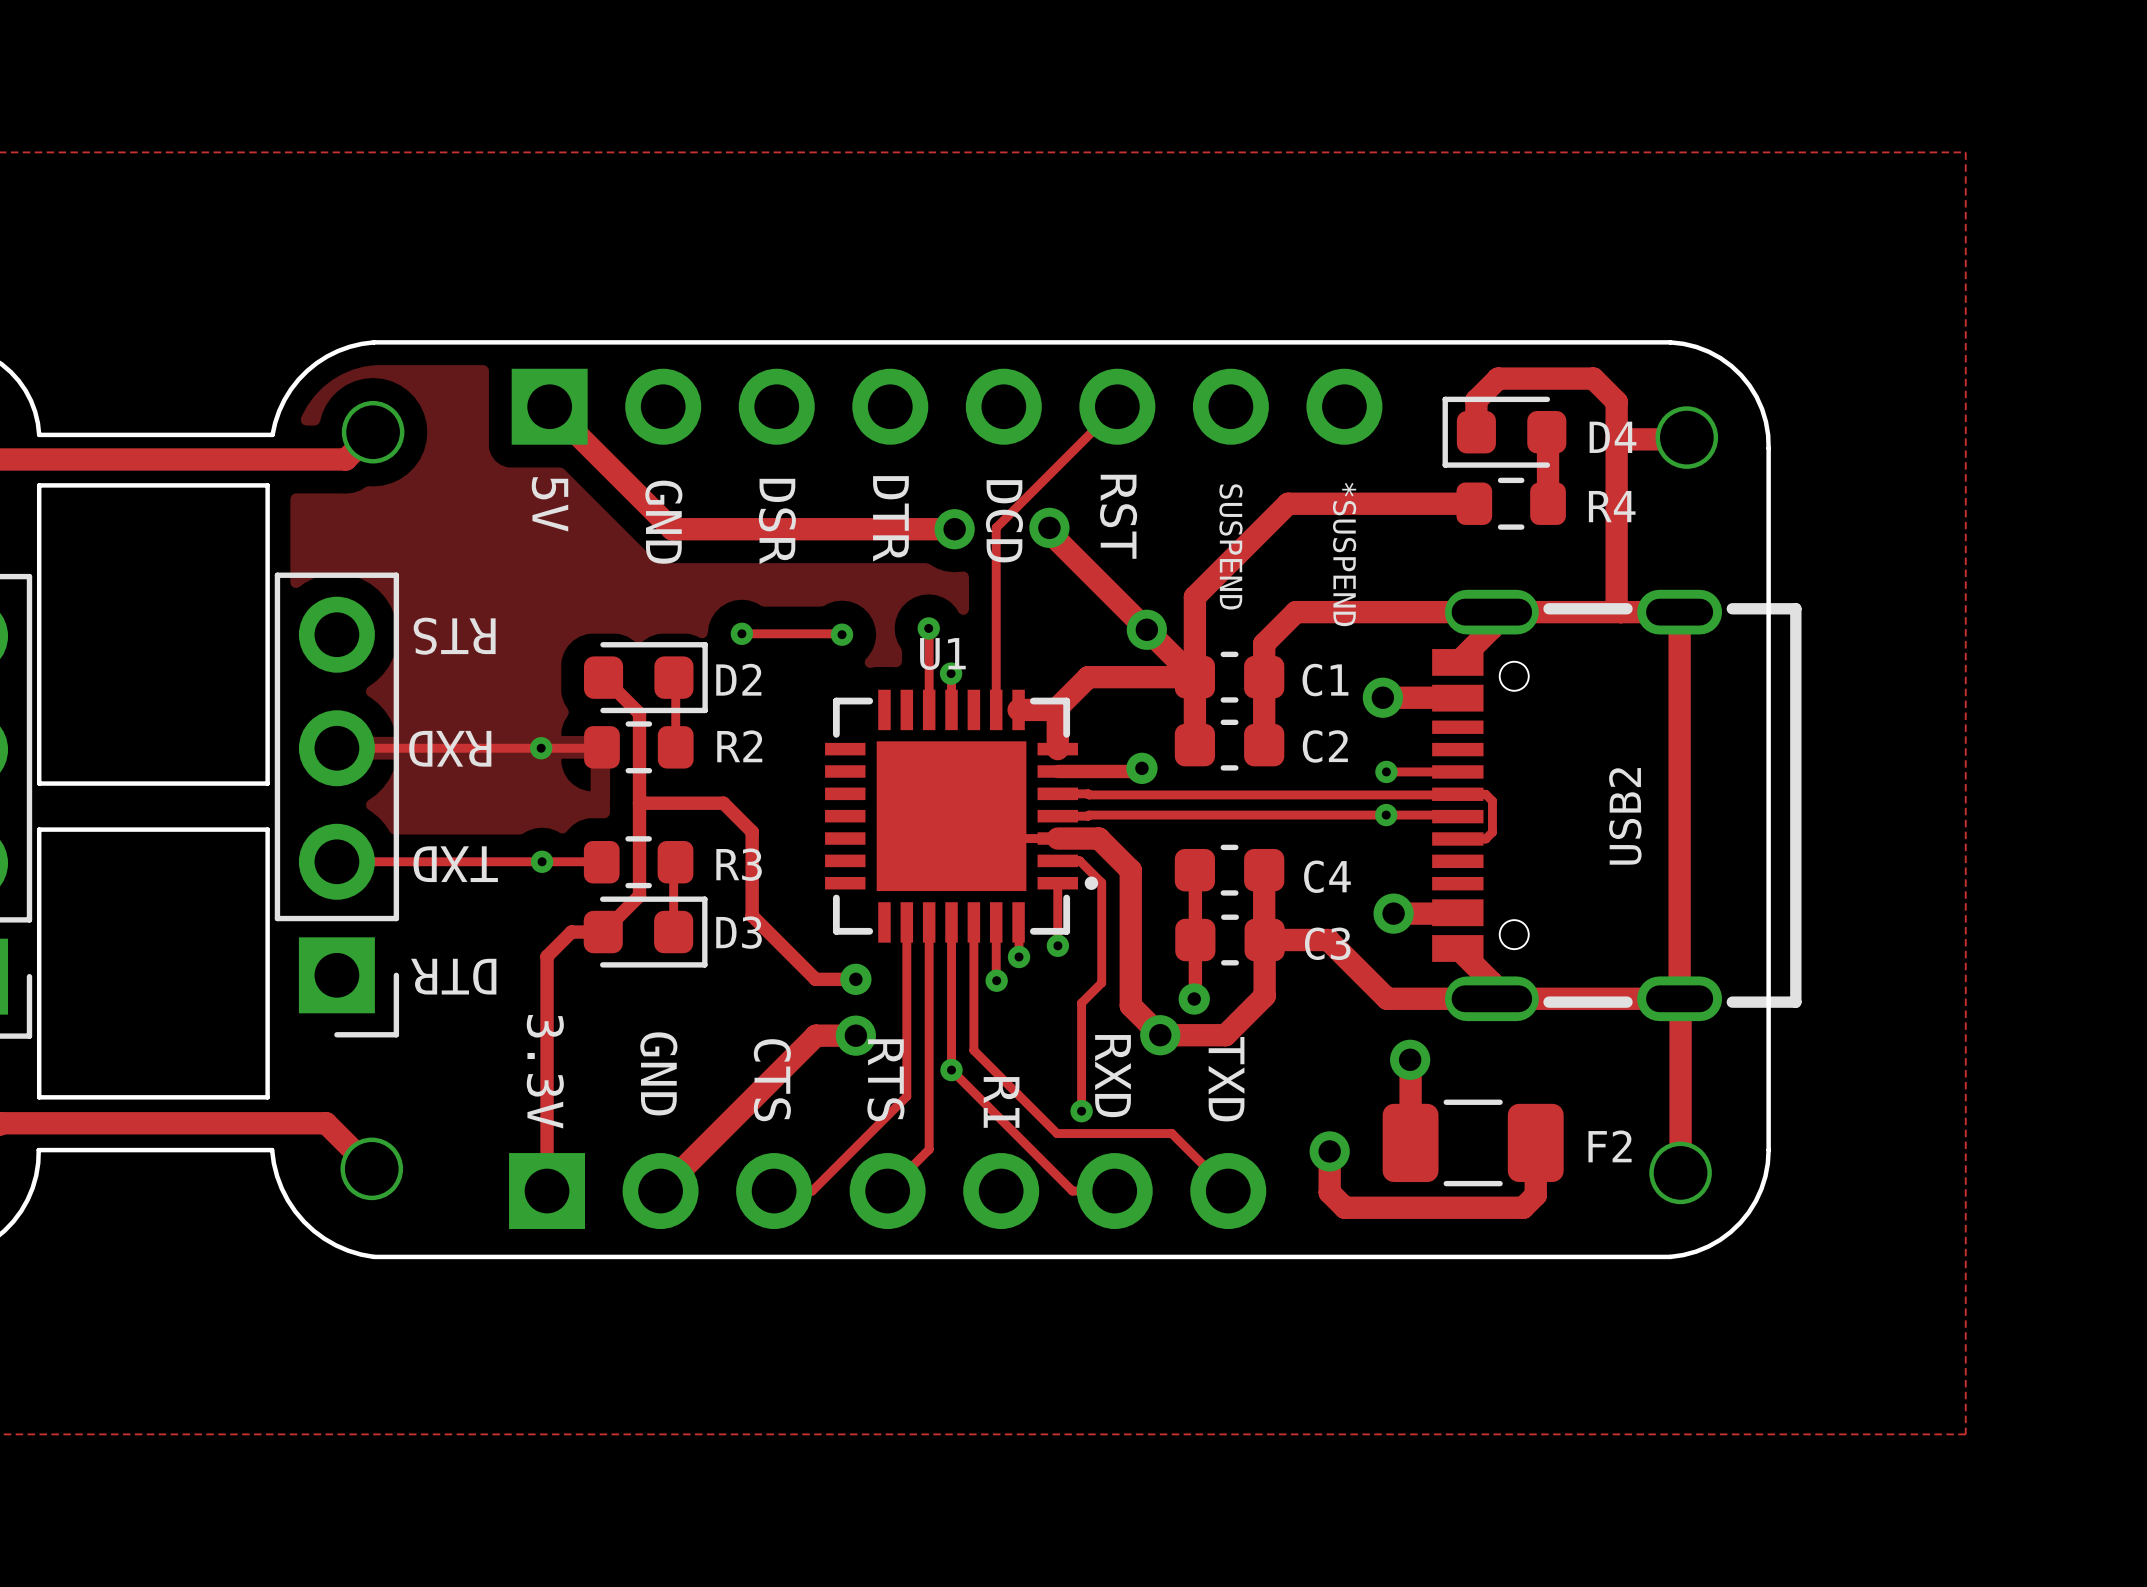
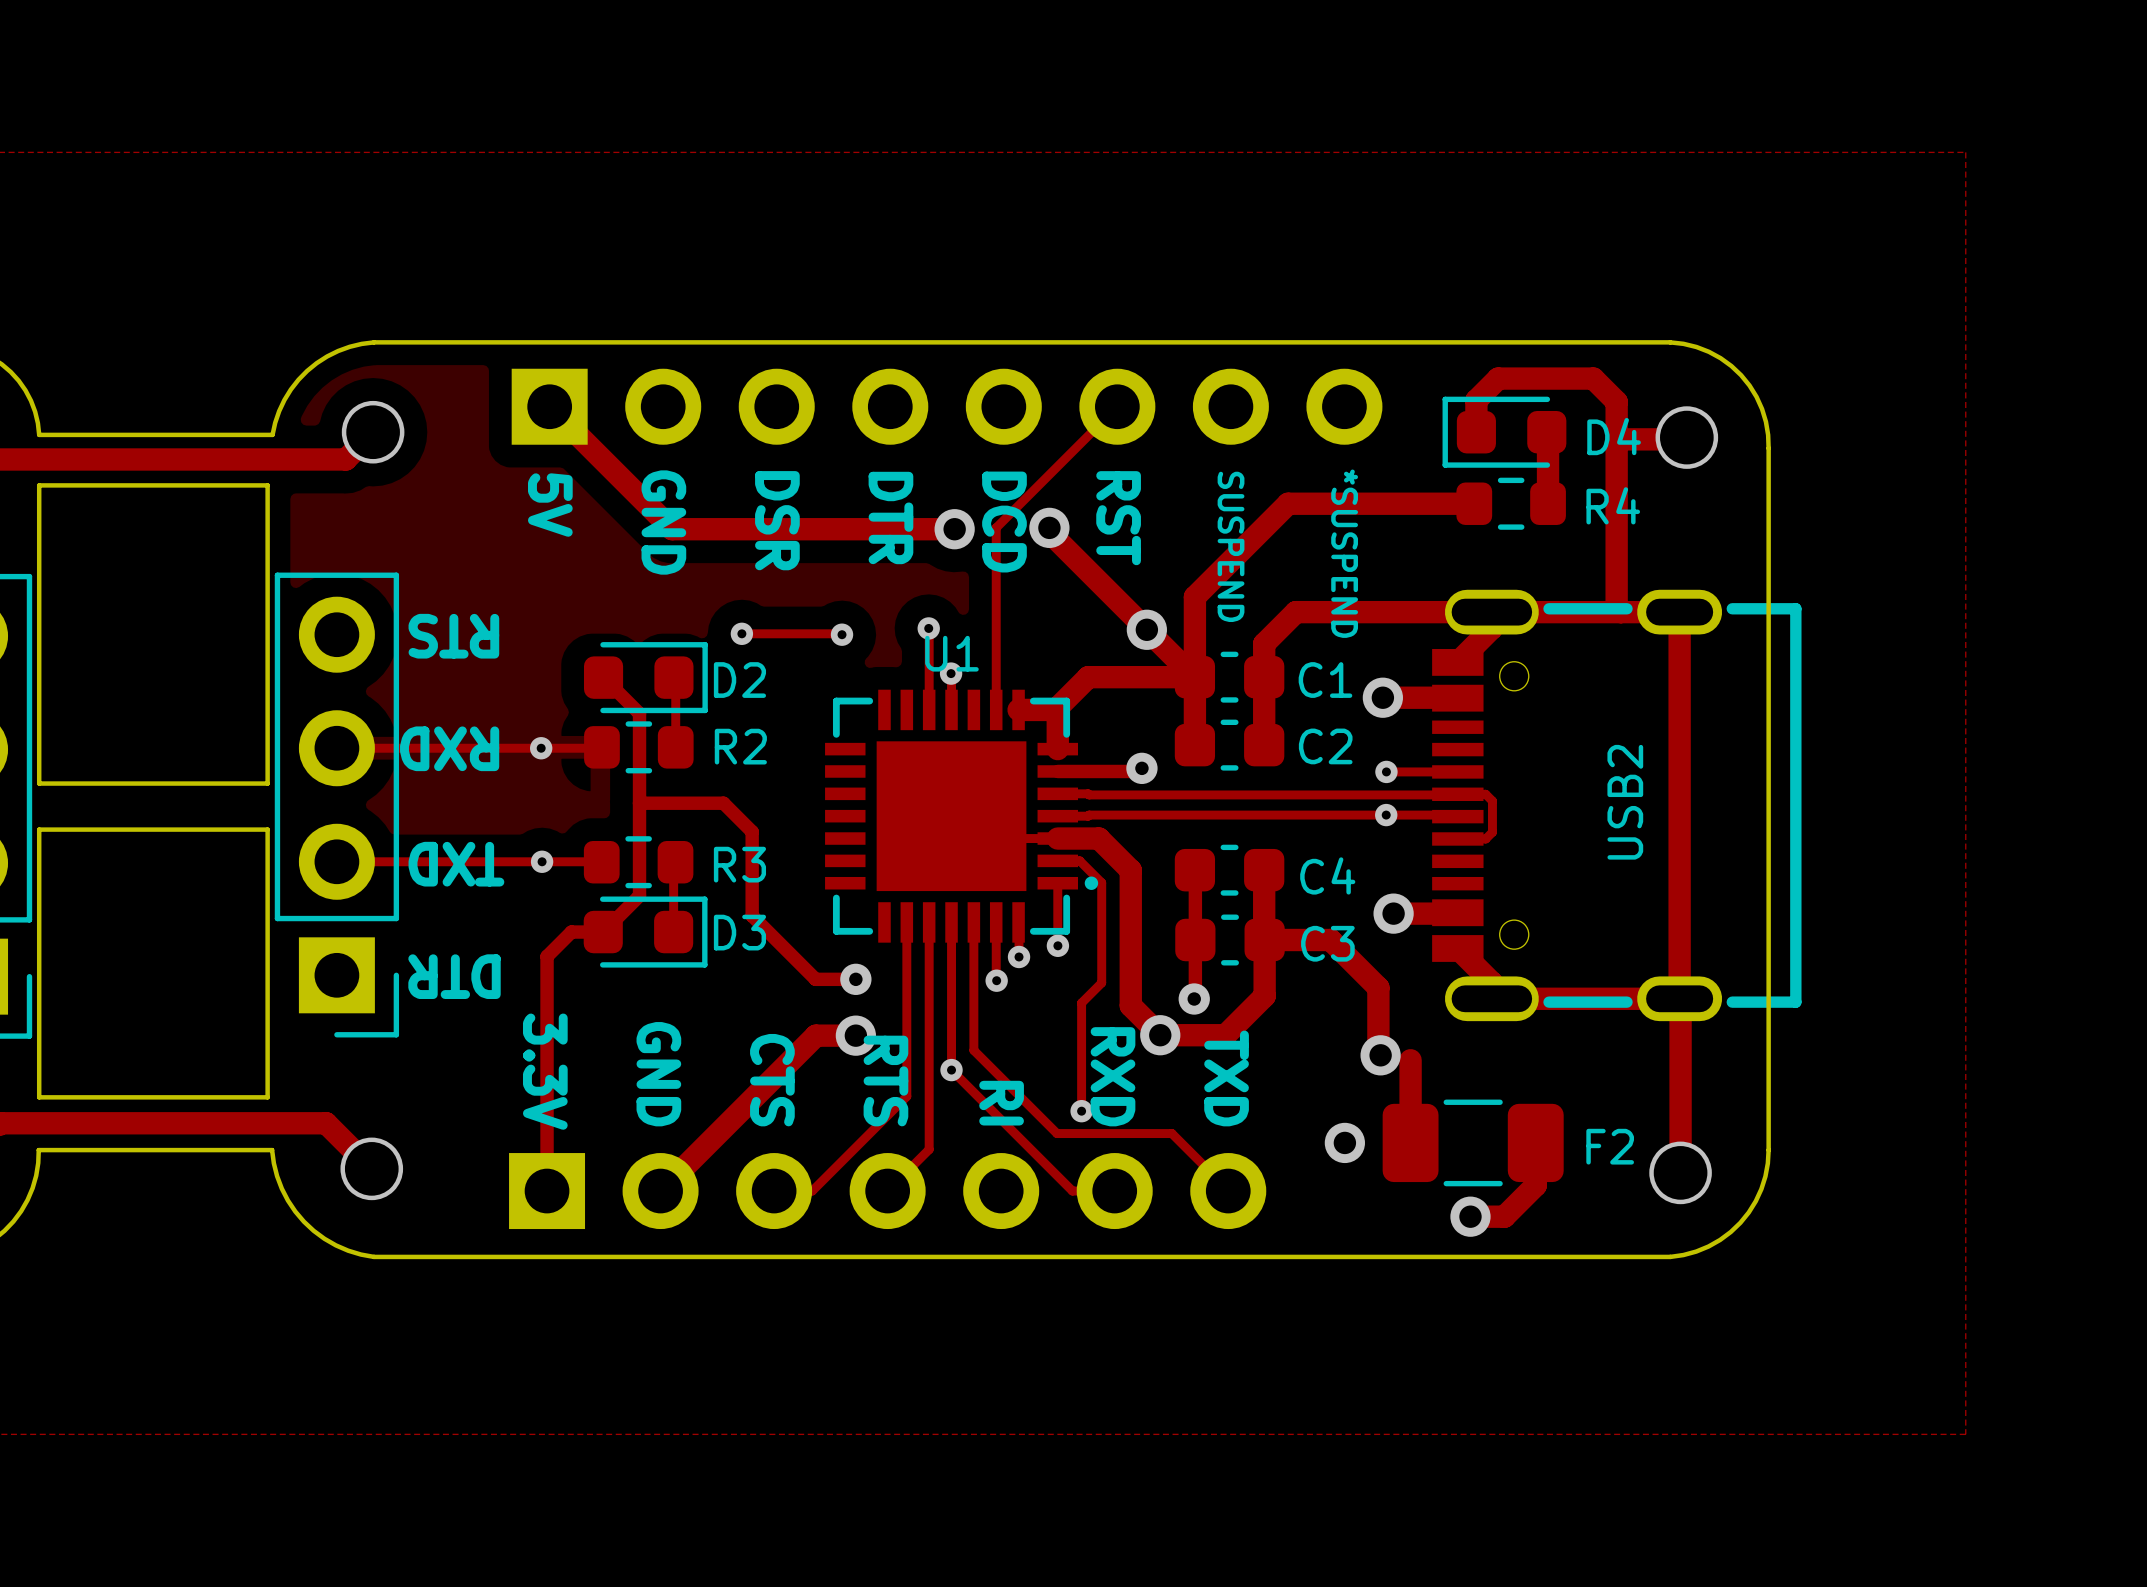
track: (1328, 940) (1387, 998) (1491, 998) -> (1328, 940) (1330, 940) (1378, 987) (1378, 1053) (1380, 1055)
via position: (1410, 1059) -> (1380, 1055)
track: (1329, 1151) (1329, 1192) (1344, 1207) (1523, 1207) (1535, 1195) (1535, 1185) -> (1470, 1216) (1504, 1216) (1535, 1185)
via position: (1329, 1151) -> (1344, 1142)
via: none -> (1470, 1216)

